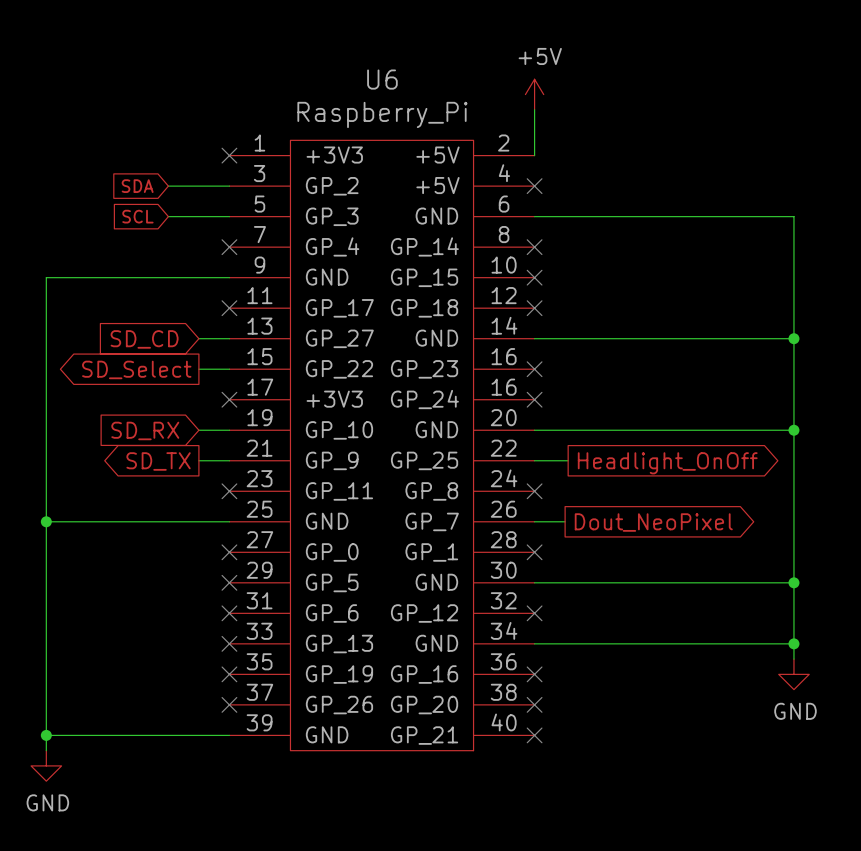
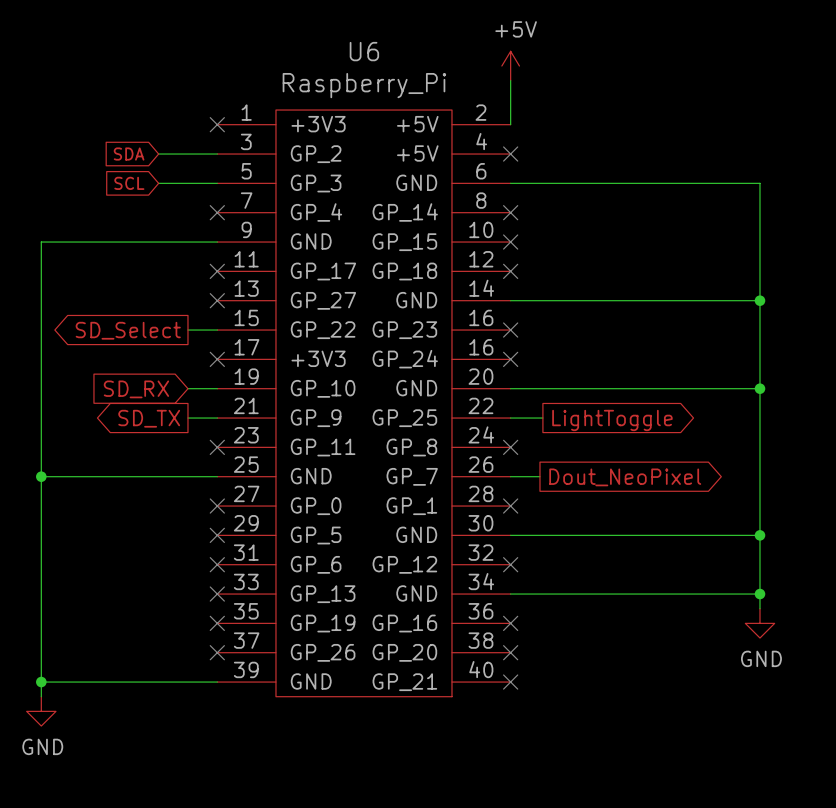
wire: (198, 338) (229, 338) -> none
no-connect mark: none -> (217, 300)
global label: SD_CD (144, 339) -> none
global label: Headlight_OnOff (667, 463) -> LightToggle (612, 420)

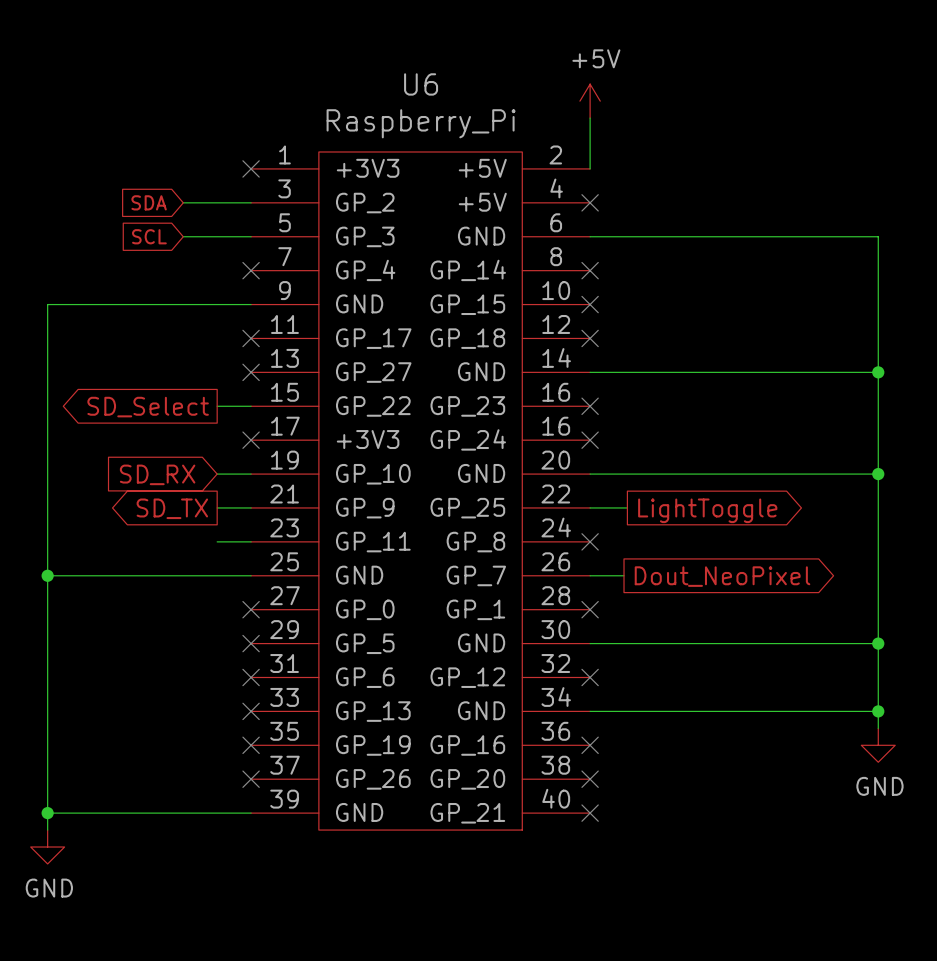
wire: none -> (217, 541) (251, 541)
no-connect mark: (217, 447) -> none

